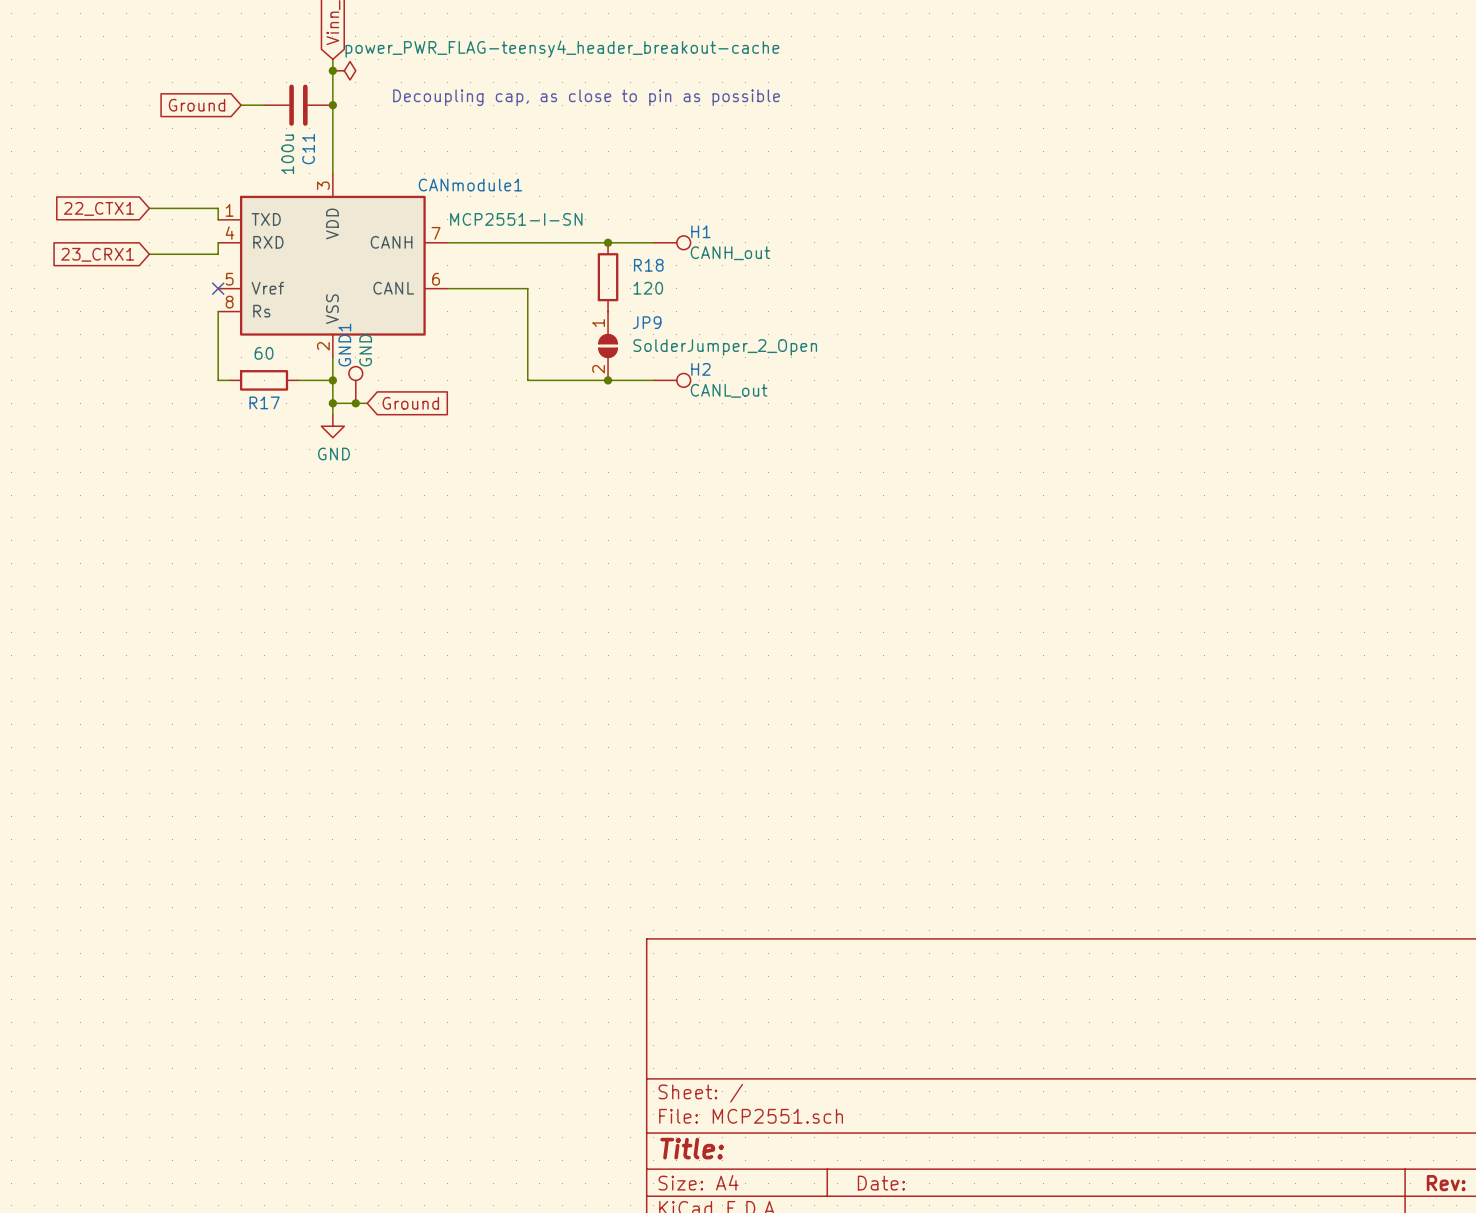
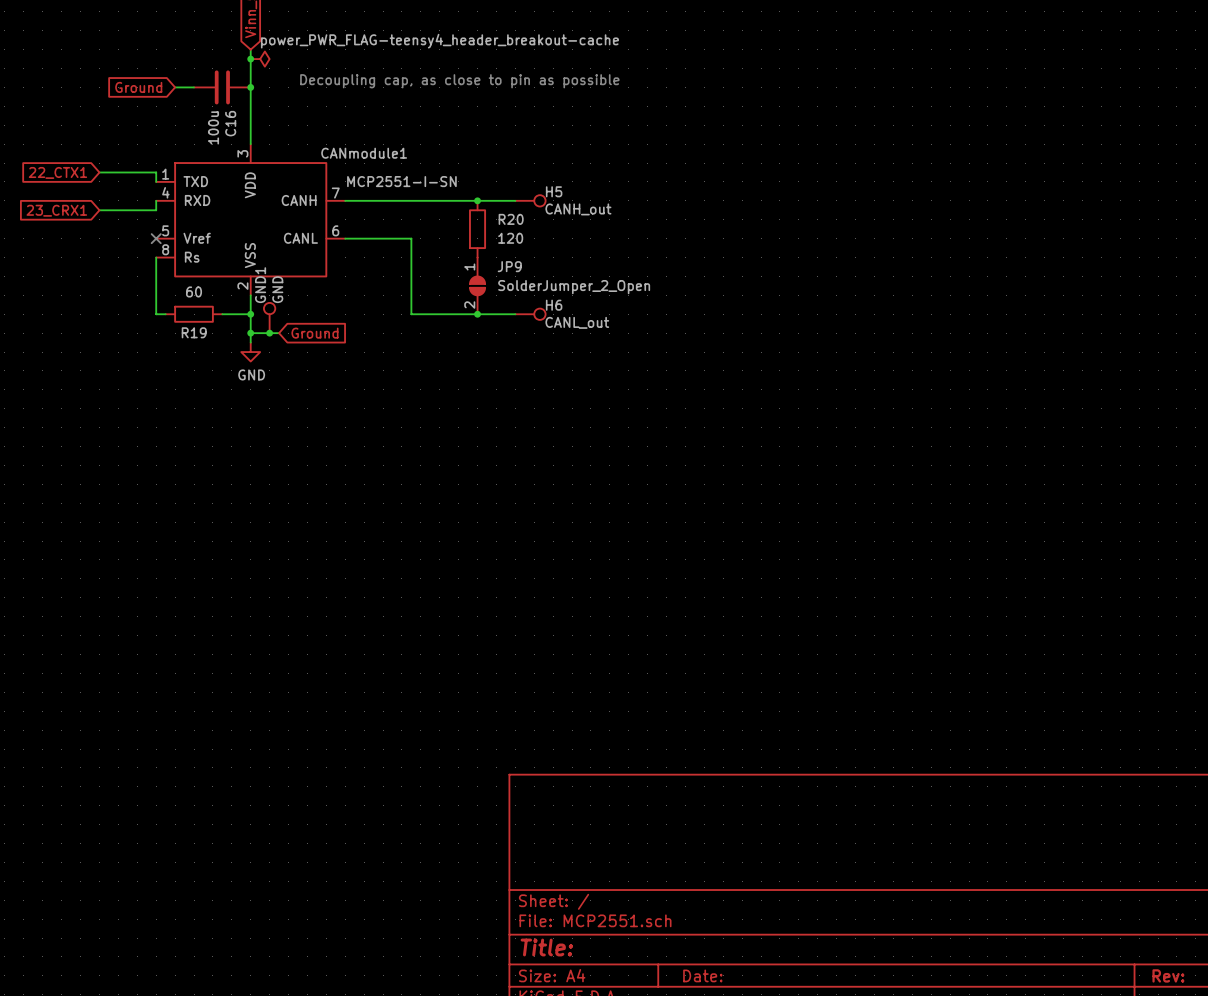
C11 name: C11 (308, 149) -> C16 (230, 123)
H1 name: H1 (700, 231) -> H5 (554, 191)
R18 name: R18 (648, 265) -> R20 (511, 219)
H2 name: H2 (700, 369) -> H6 (554, 305)
R17 name: R17 (264, 402) -> R19 (194, 332)

